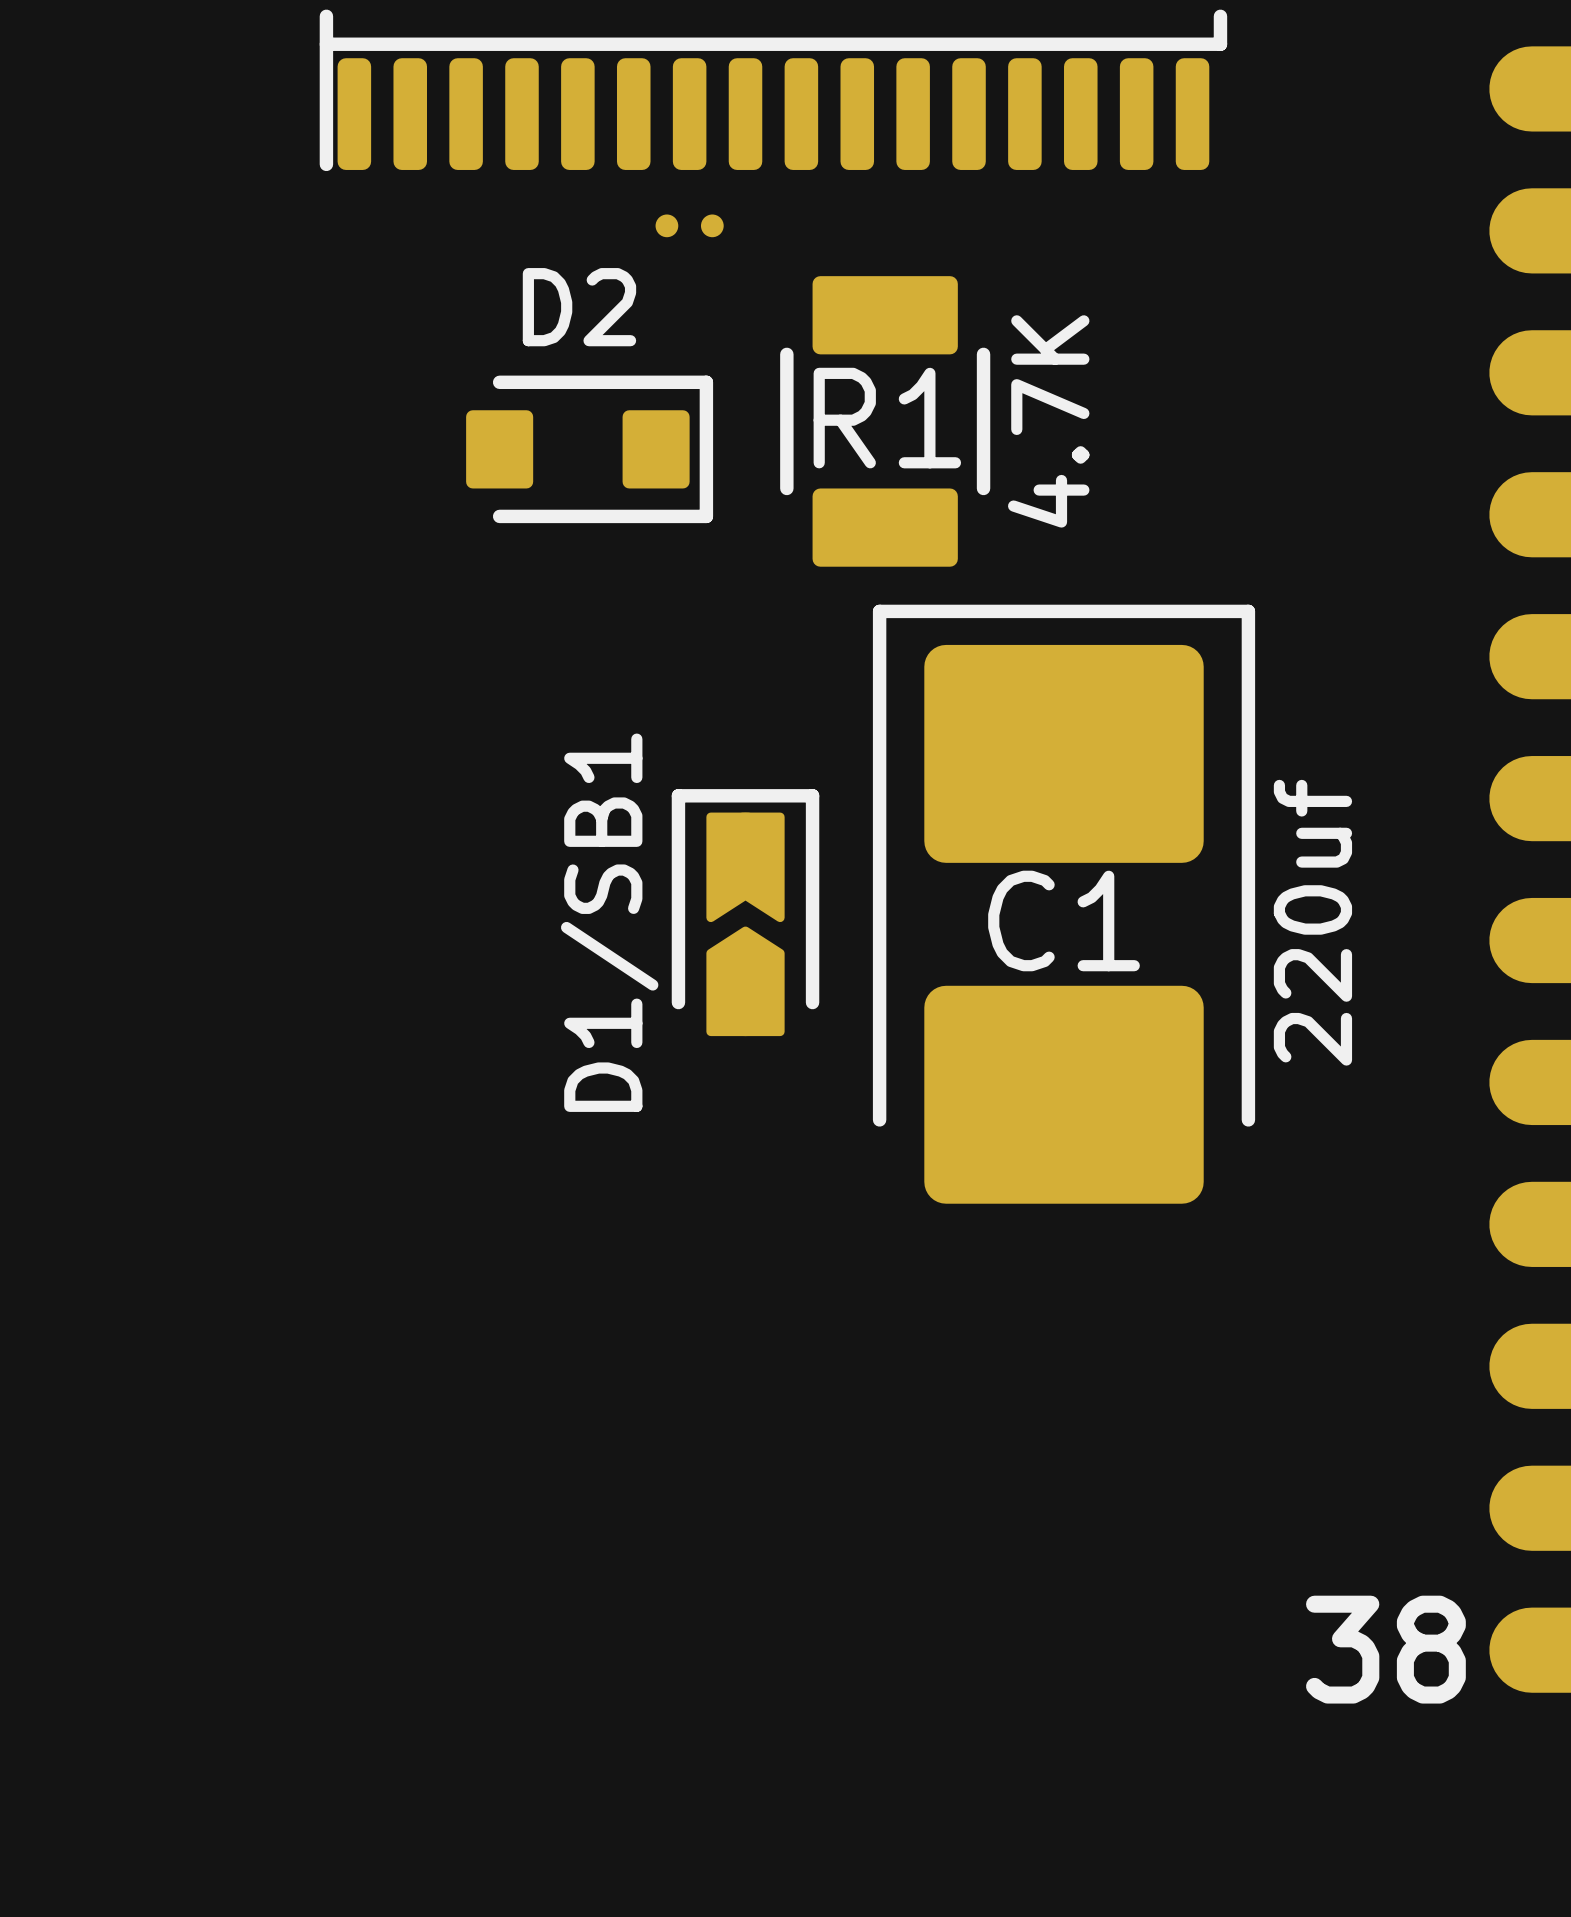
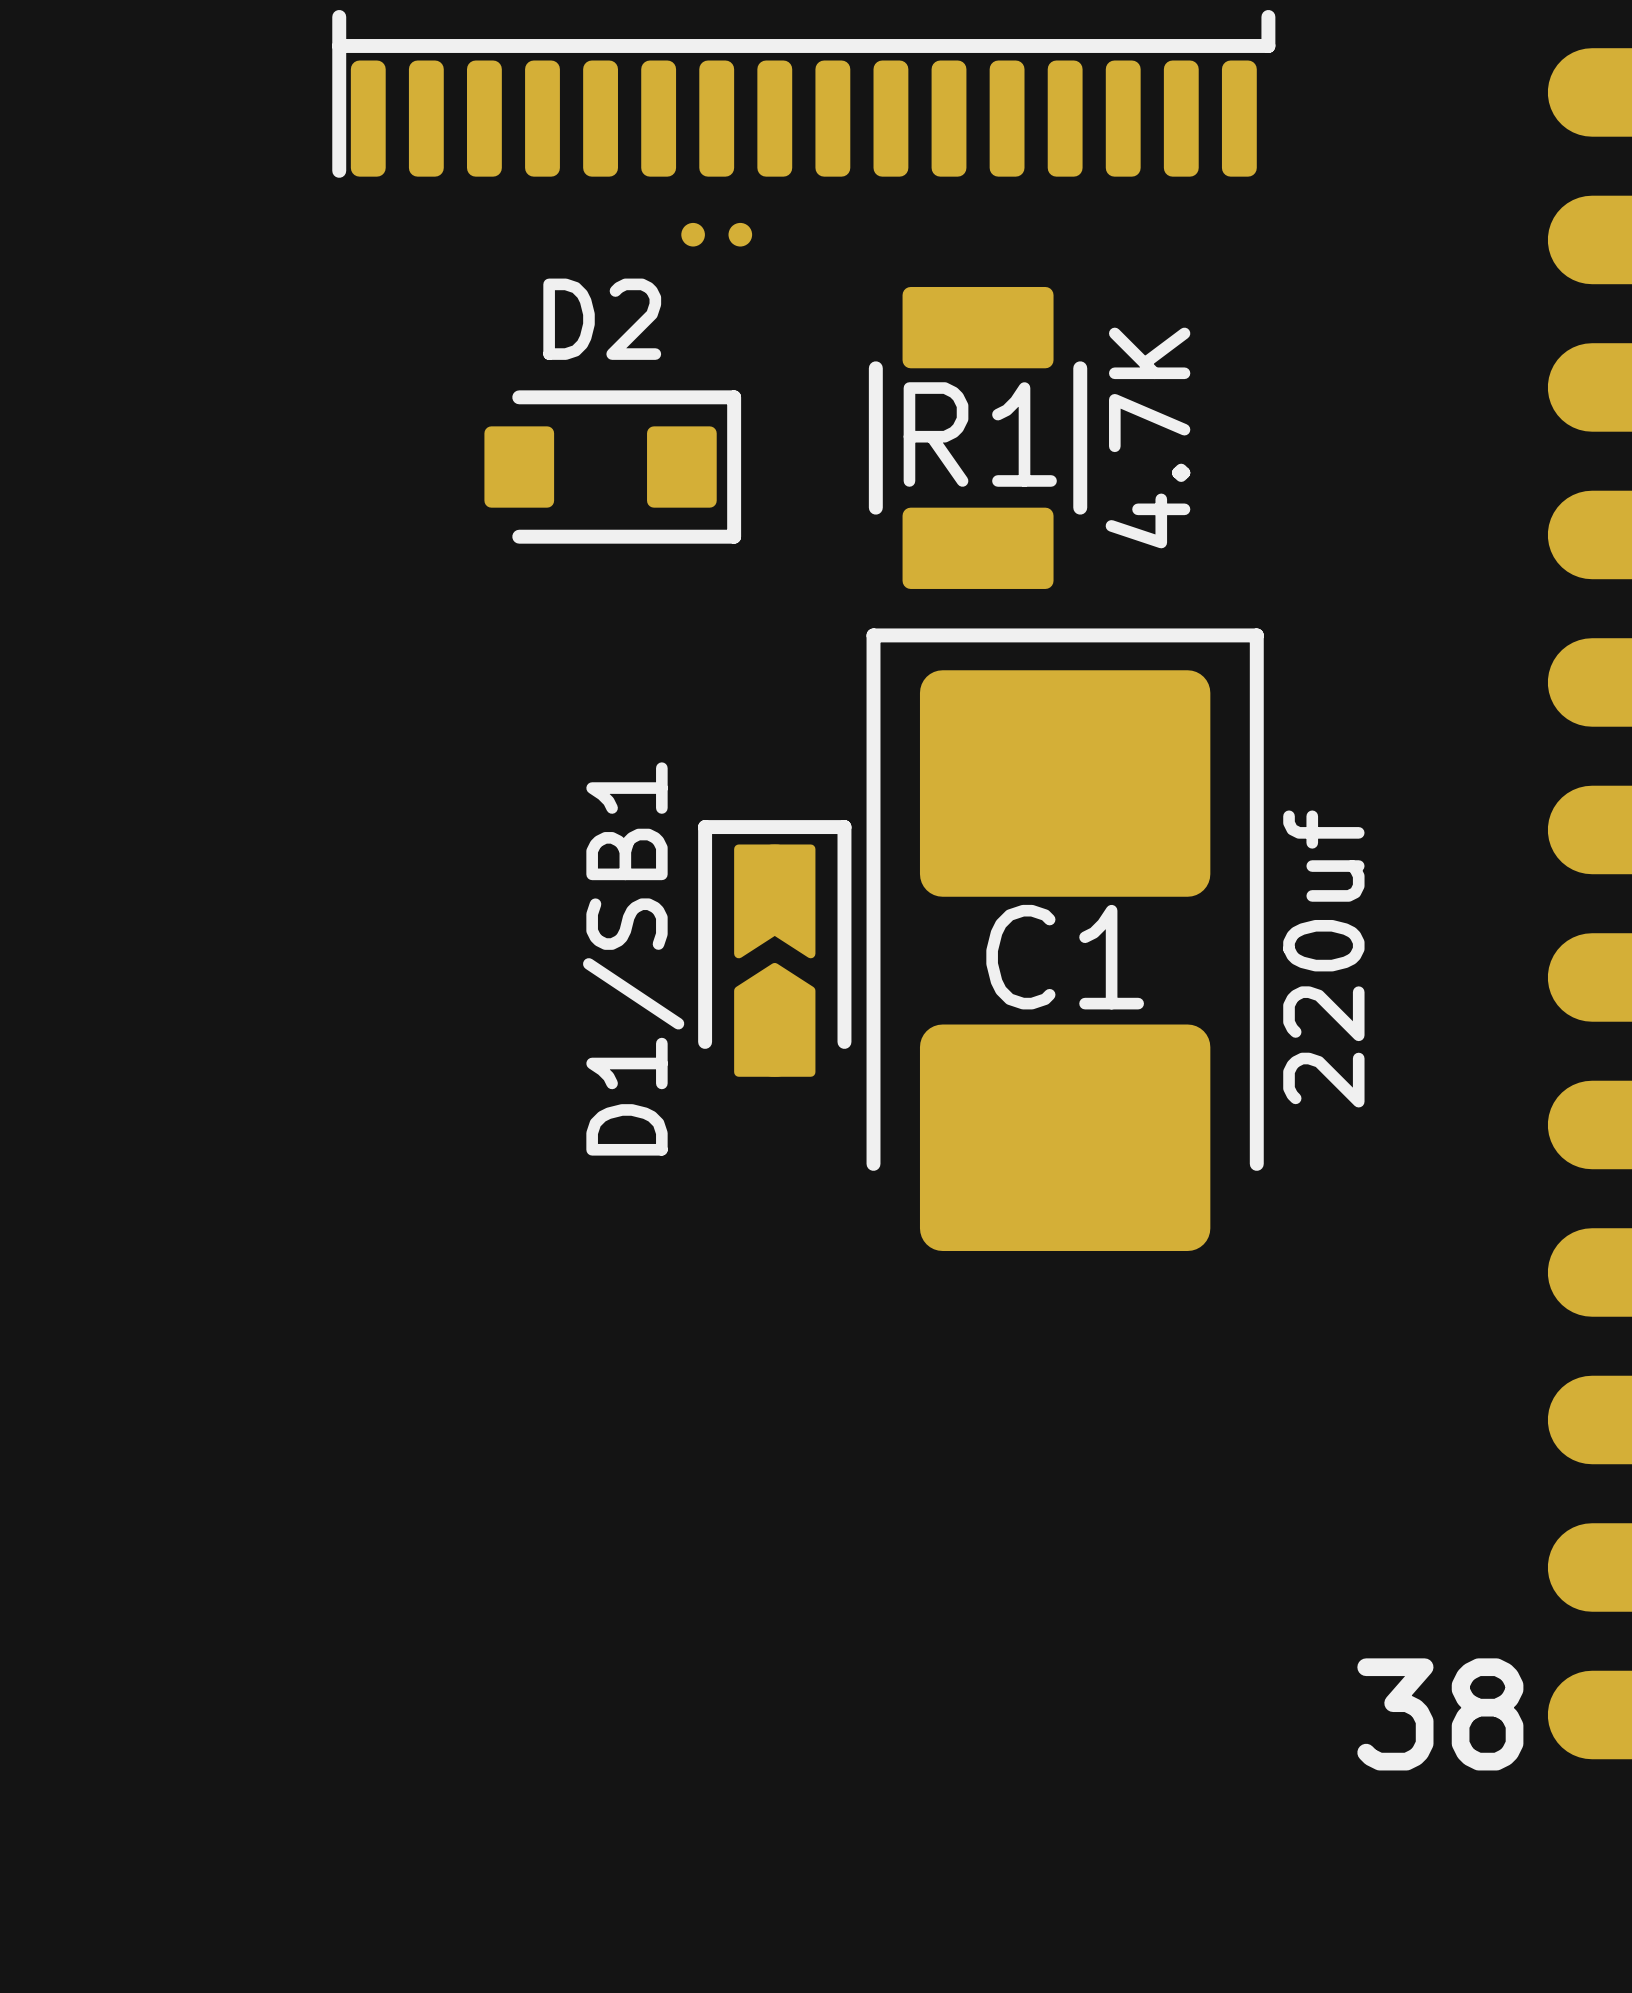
R1 position: (885, 421) -> (978, 437)
C1 position: (1064, 904) -> (1065, 939)

